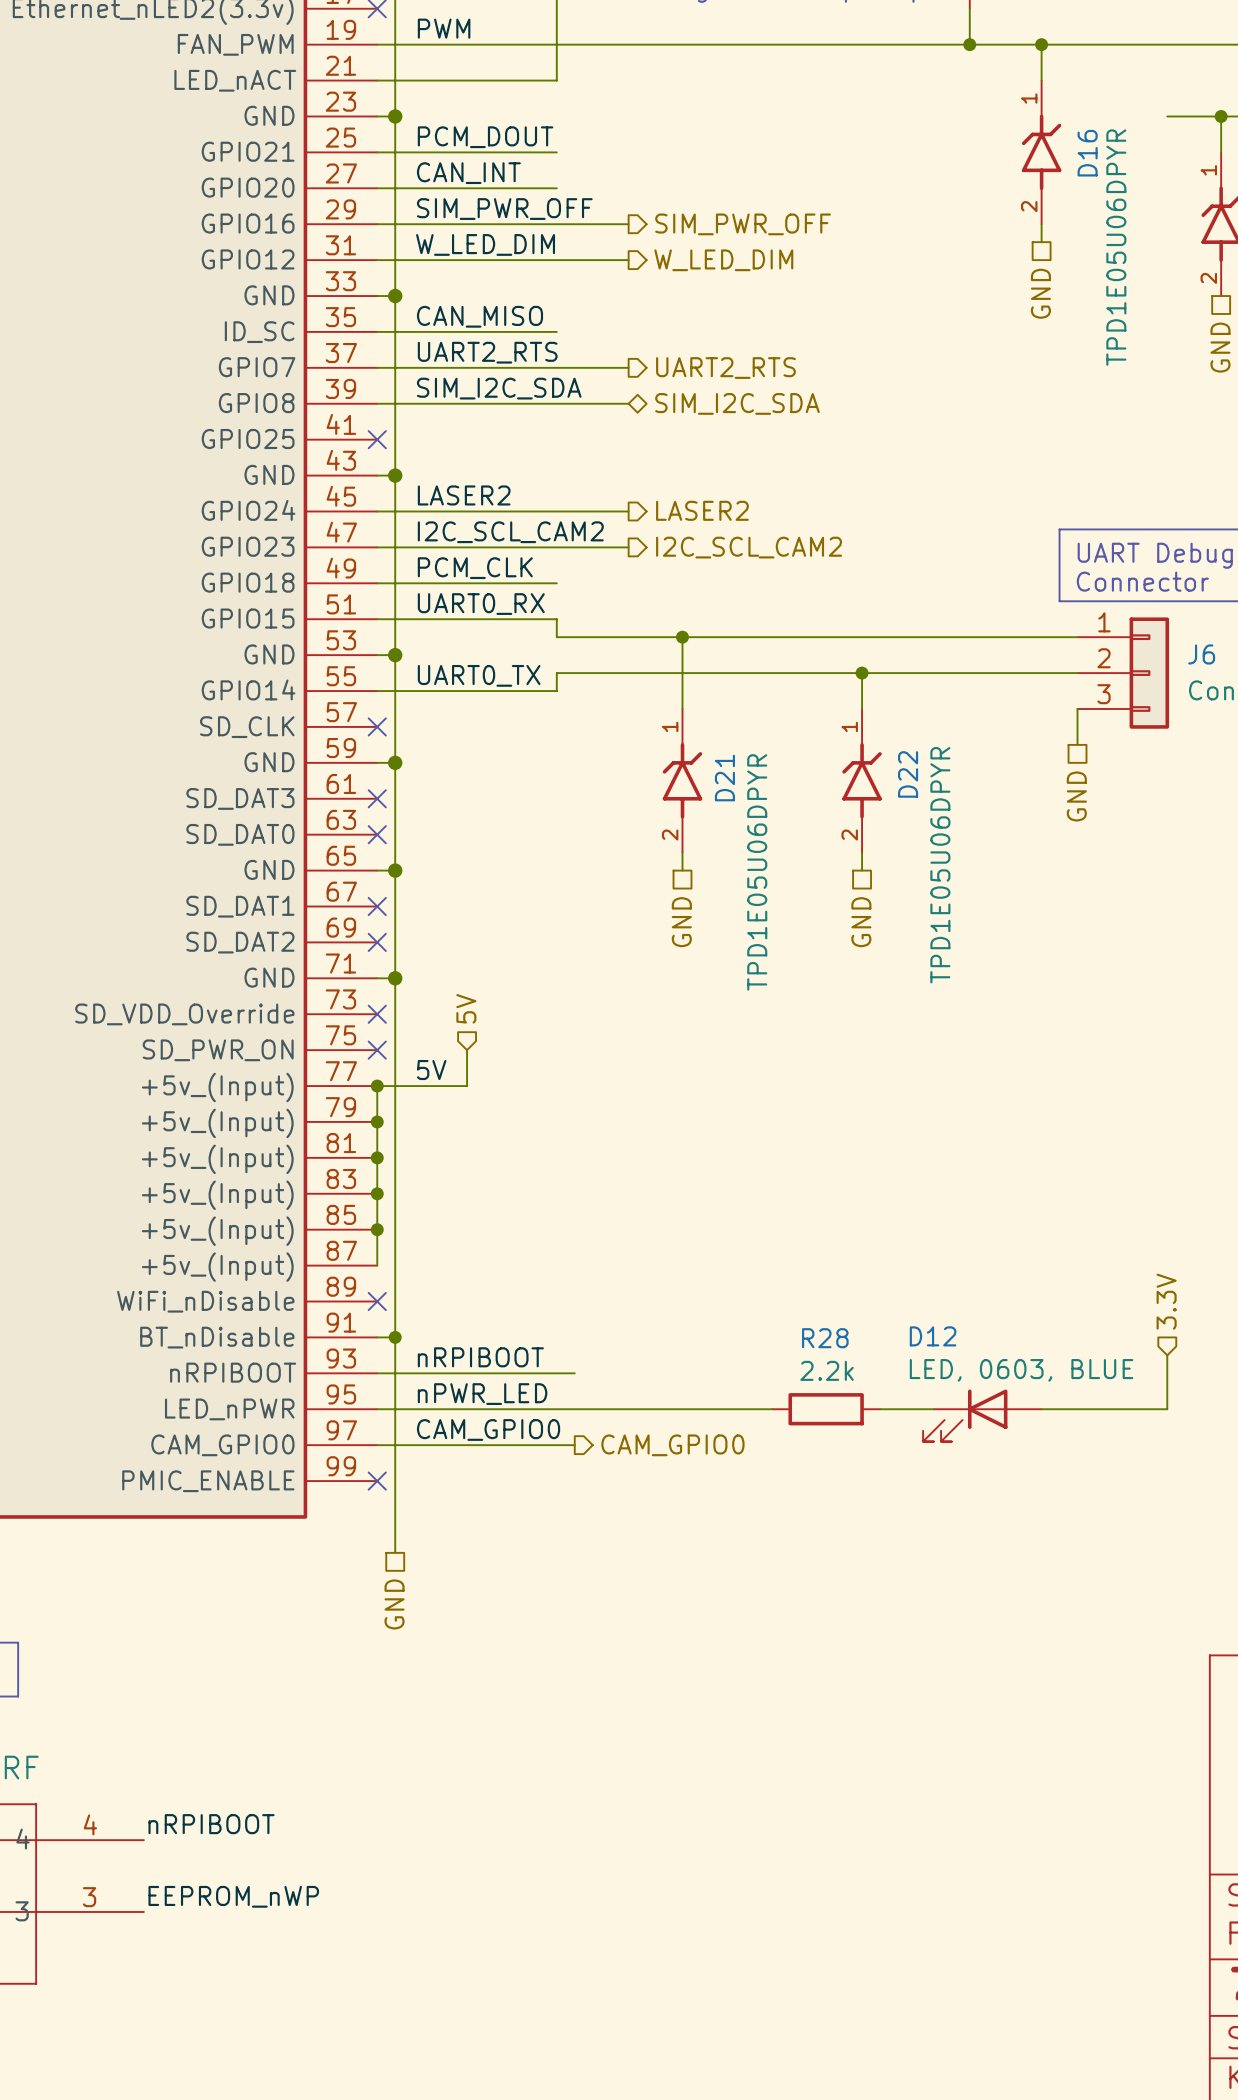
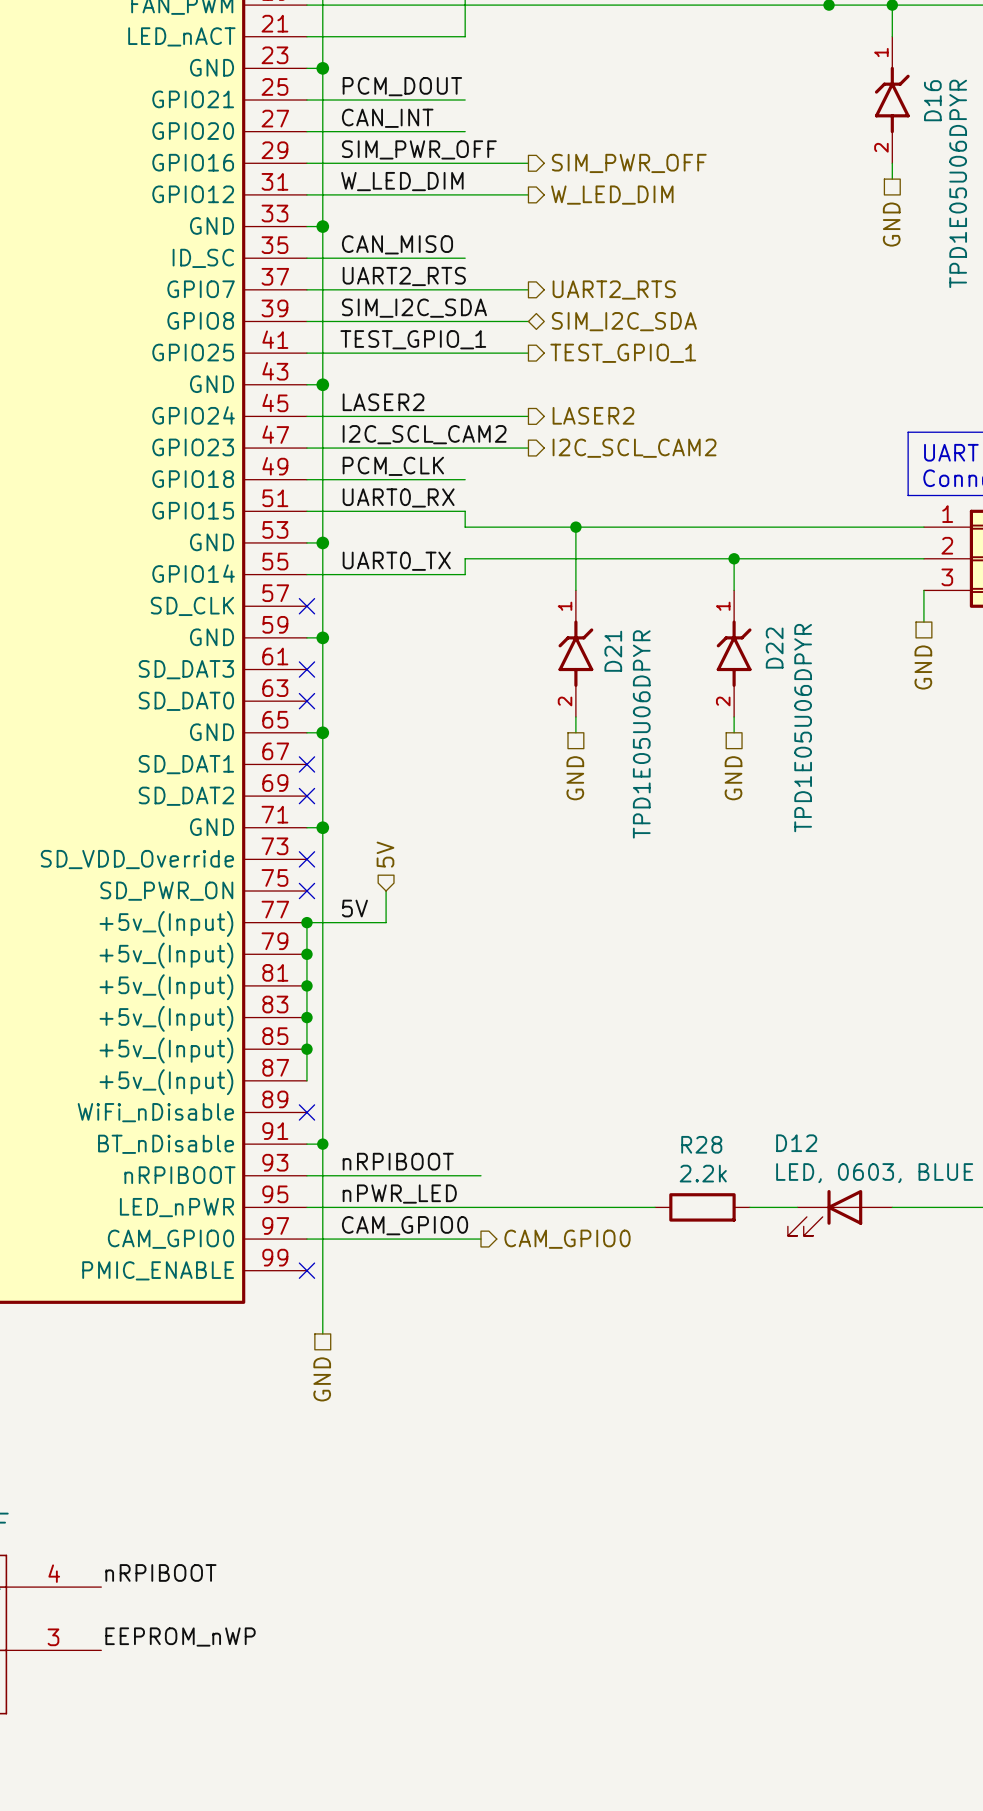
label: none -> TEST_GPIO_1 (413, 339)
wire: none -> (306, 353) (528, 353)
no-connect mark: (377, 439) -> none
hierarchical label: none -> TEST_GPIO_1 (623, 353)

